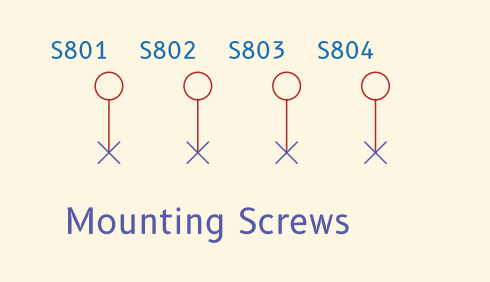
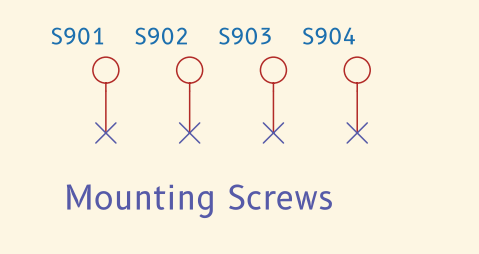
S801 name: S801 (78, 49) -> S901 (77, 36)
S802 name: S802 (167, 49) -> S902 (161, 36)
S803 name: S803 (256, 49) -> S903 (244, 36)
S804 name: S804 (345, 49) -> S904 (329, 36)

